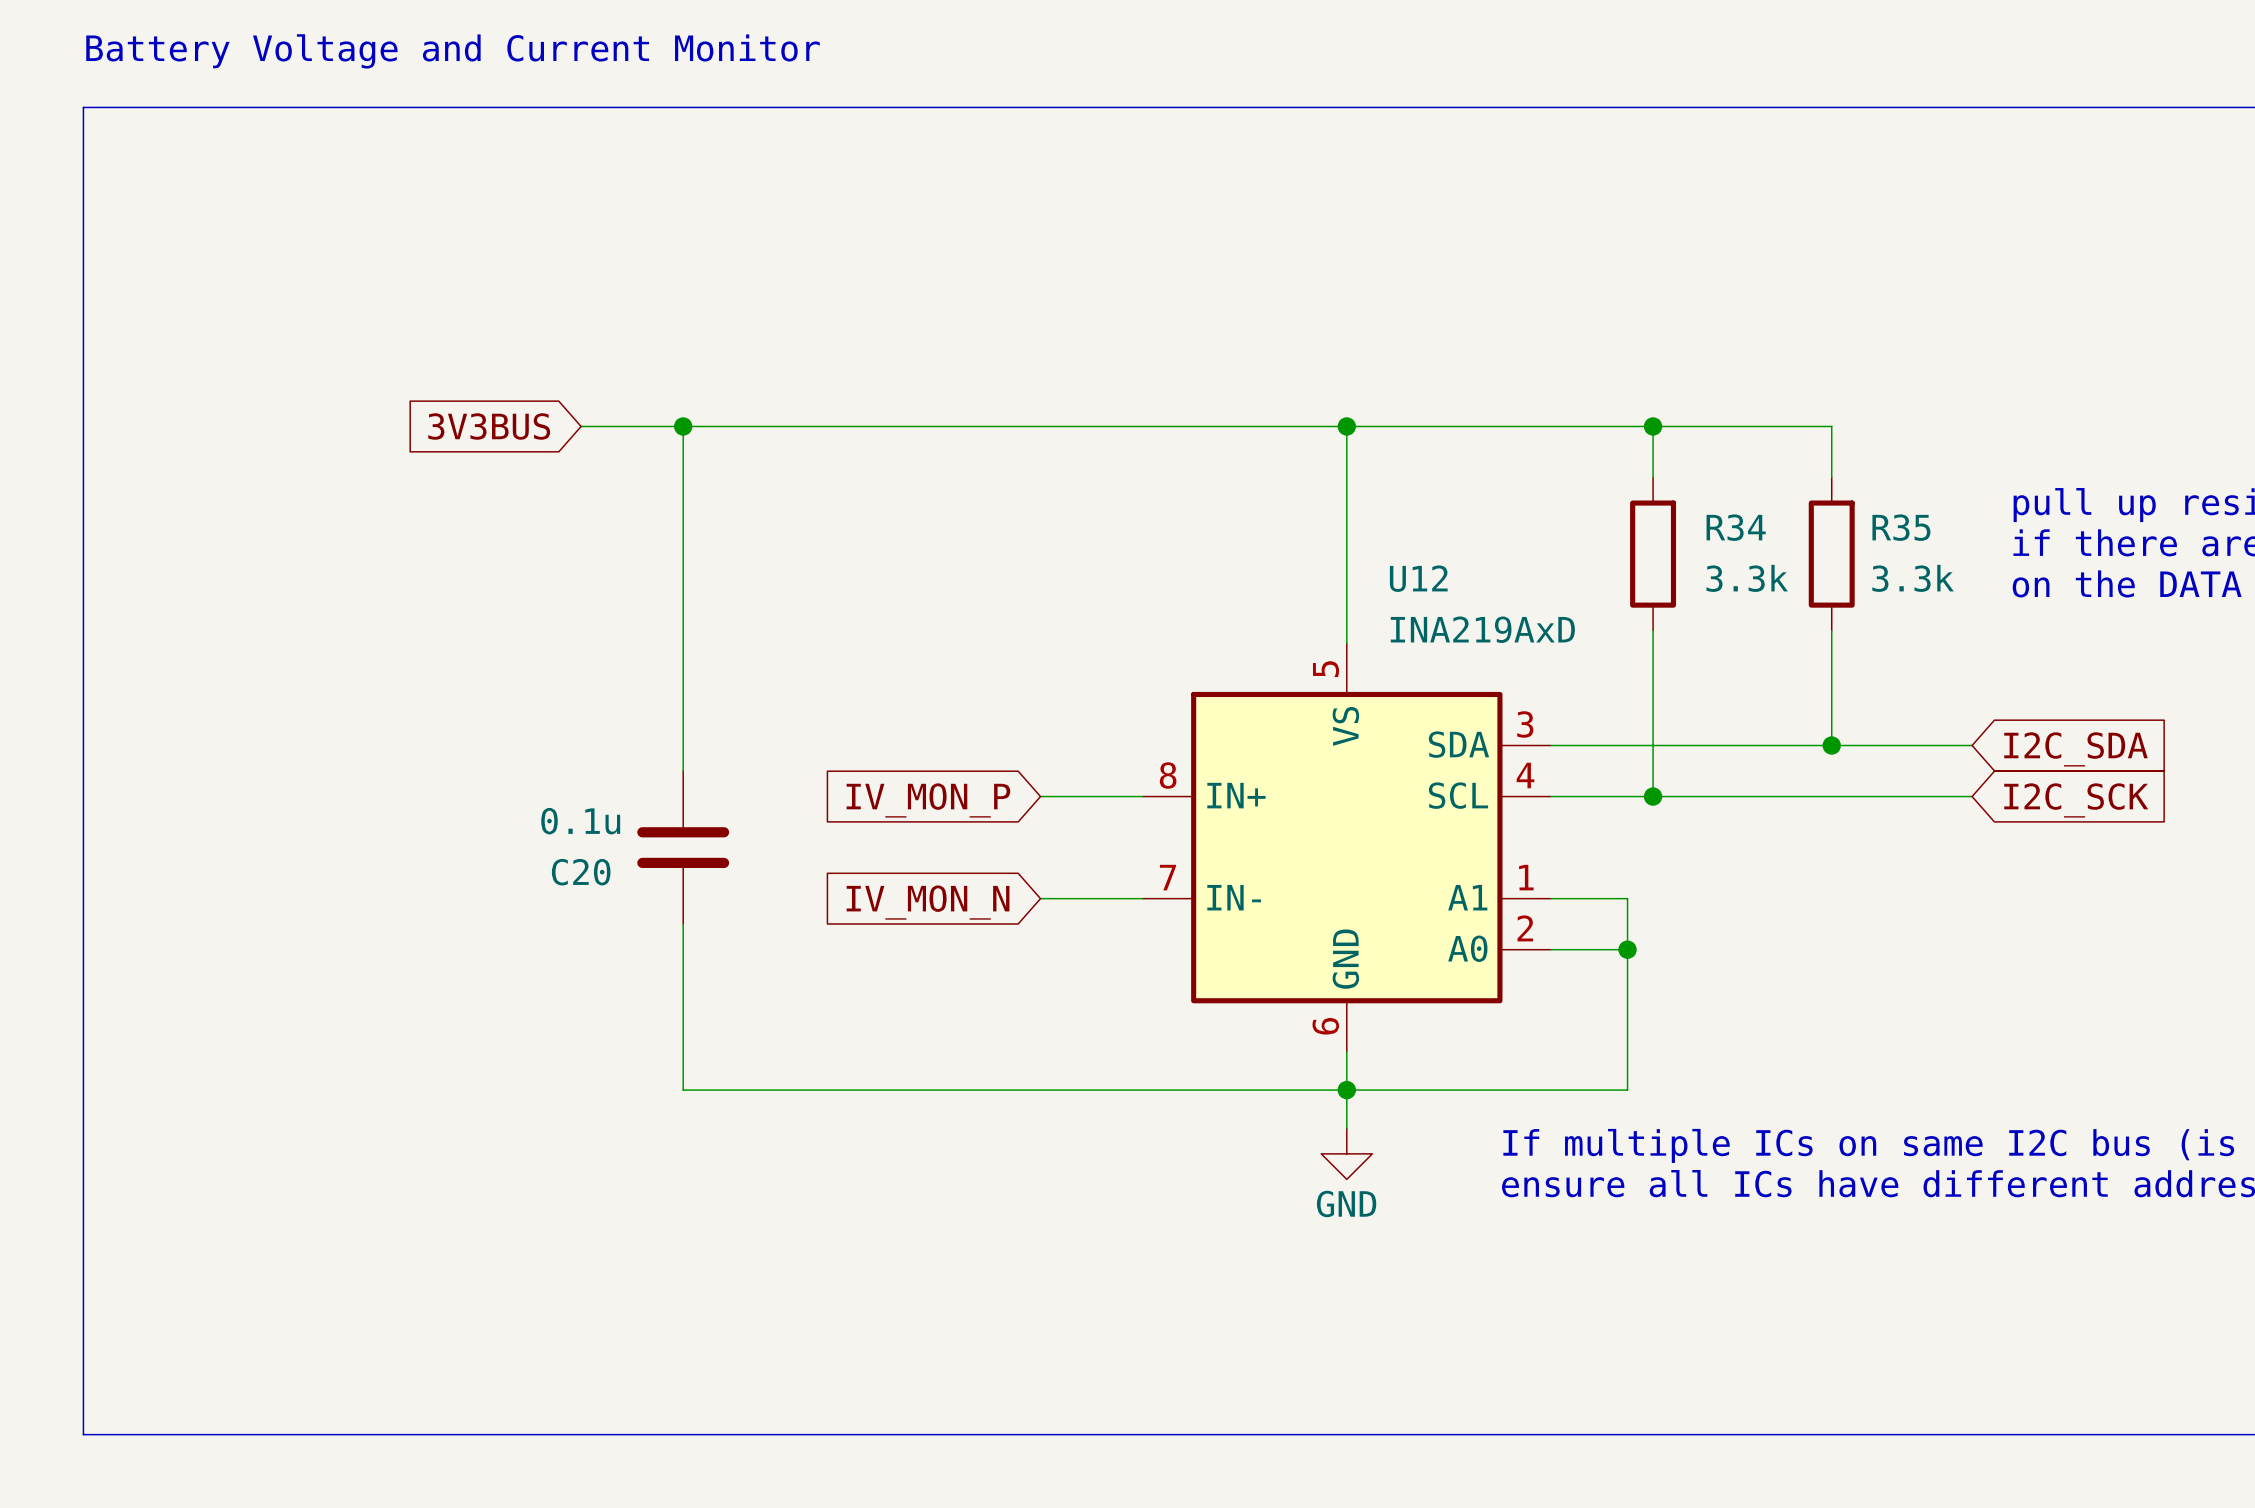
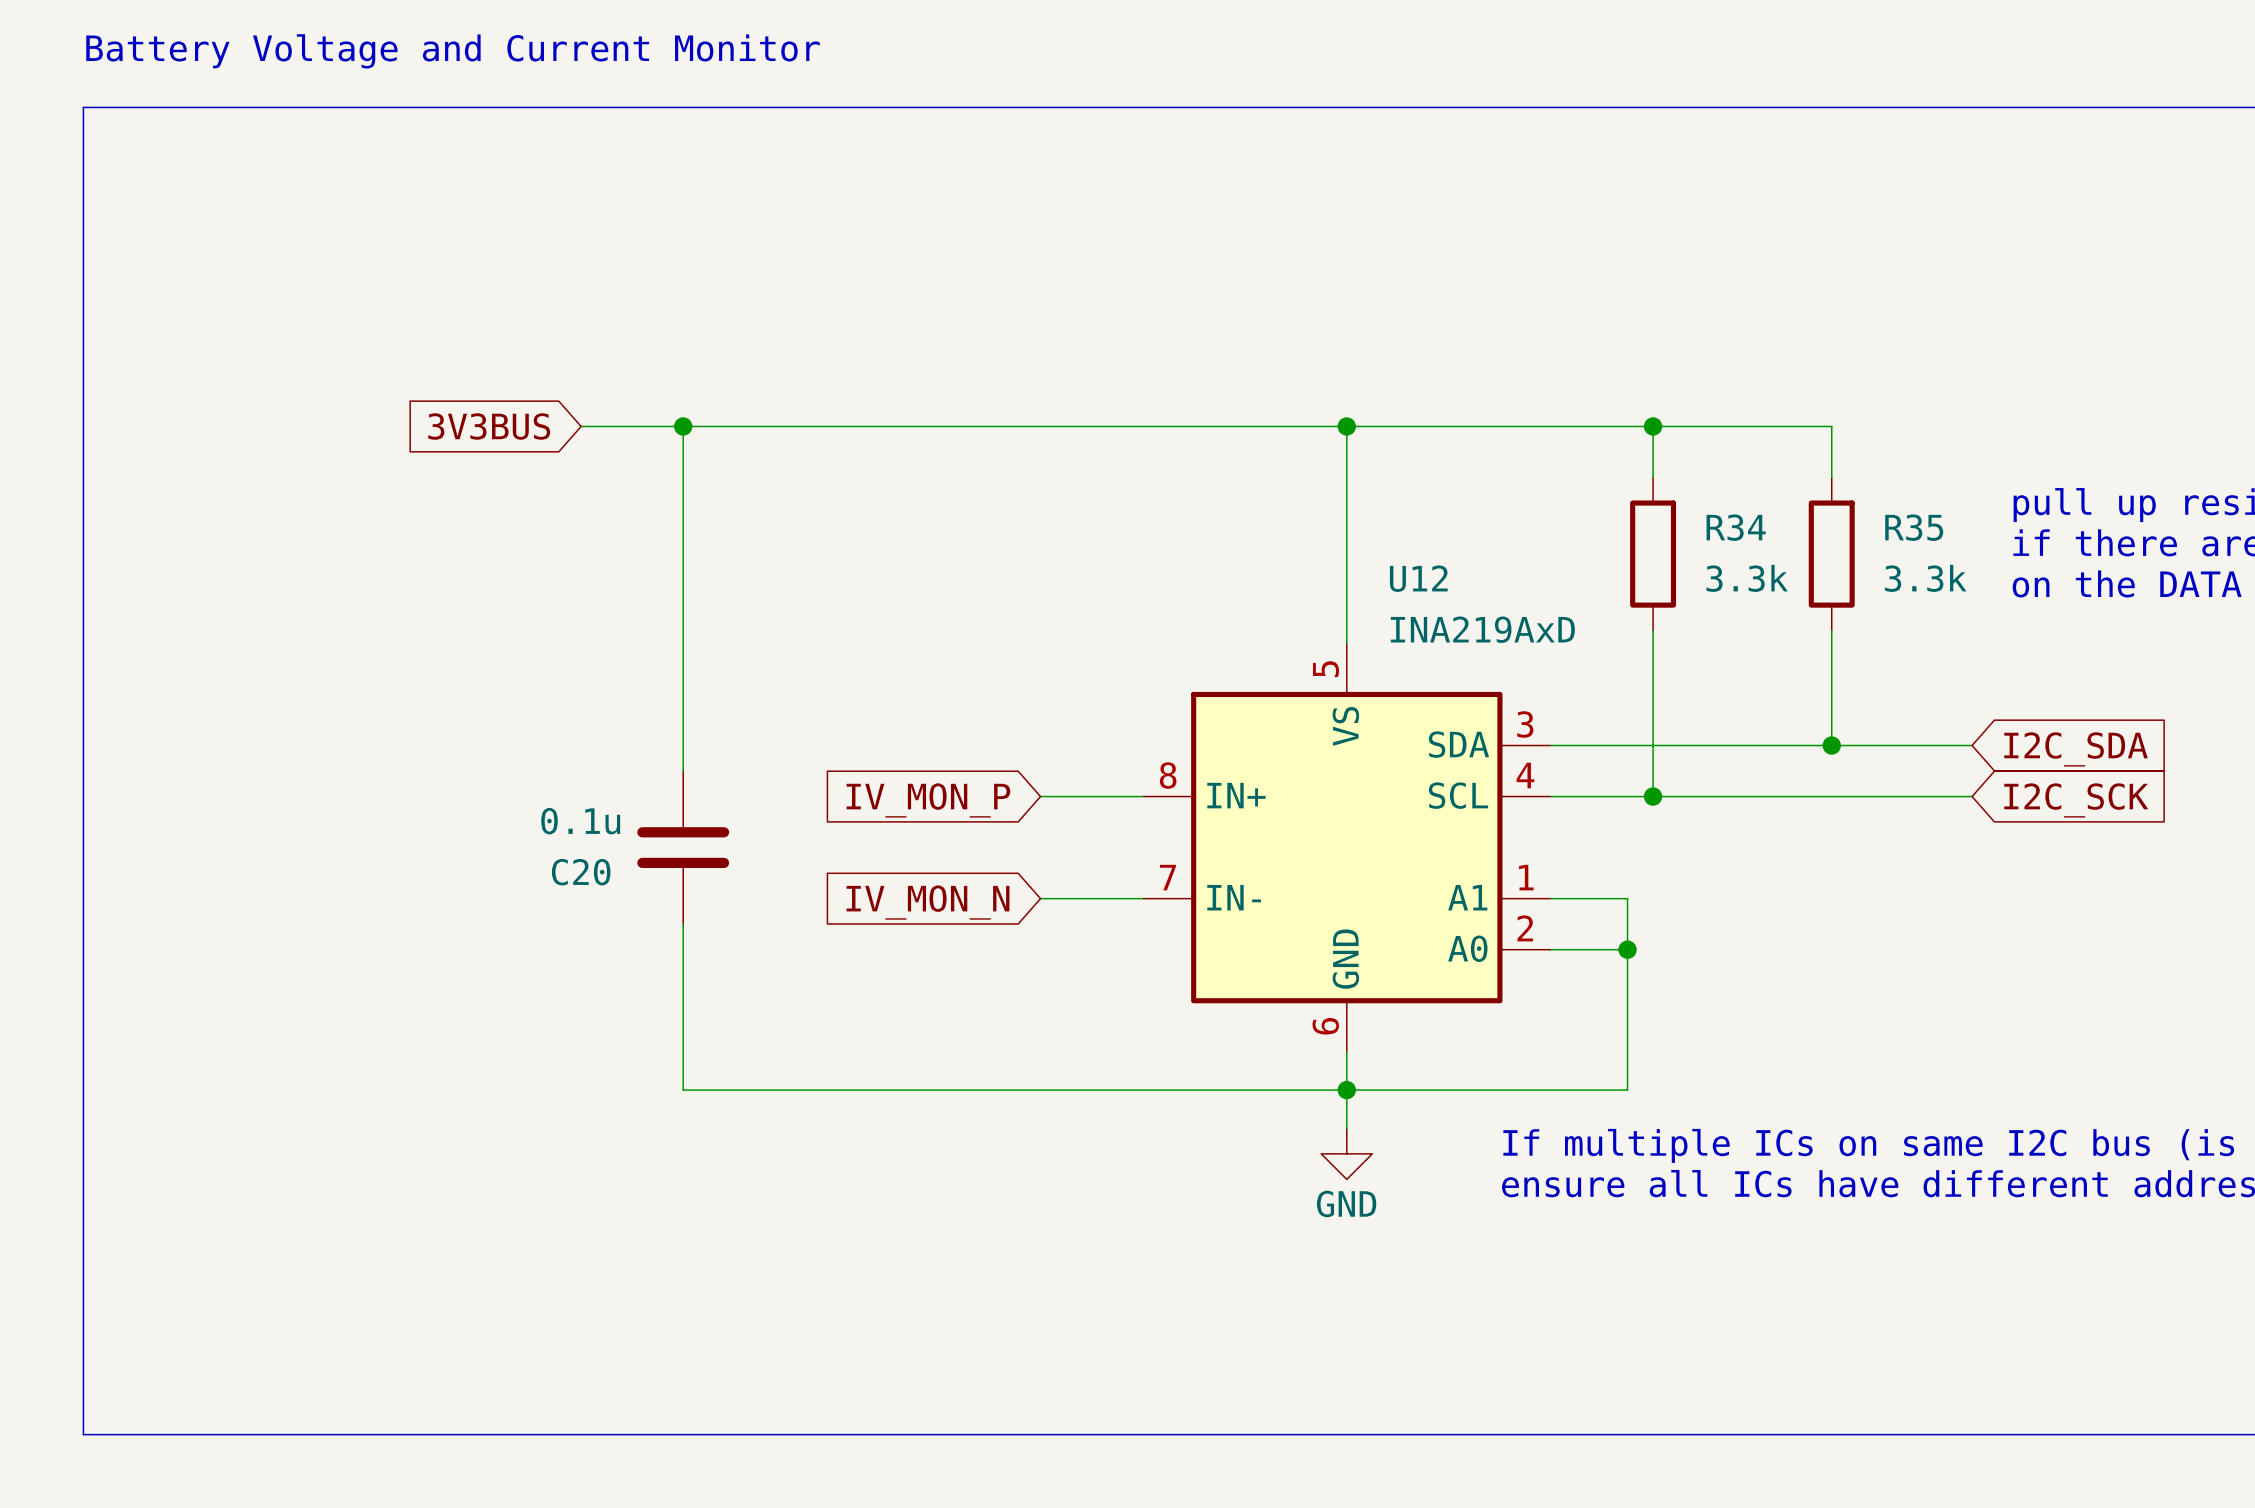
R35 name position: R35 (1901, 527) -> R35 (1914, 527)
R35 value position: 3.3k (1913, 578) -> 3.3k (1925, 578)

